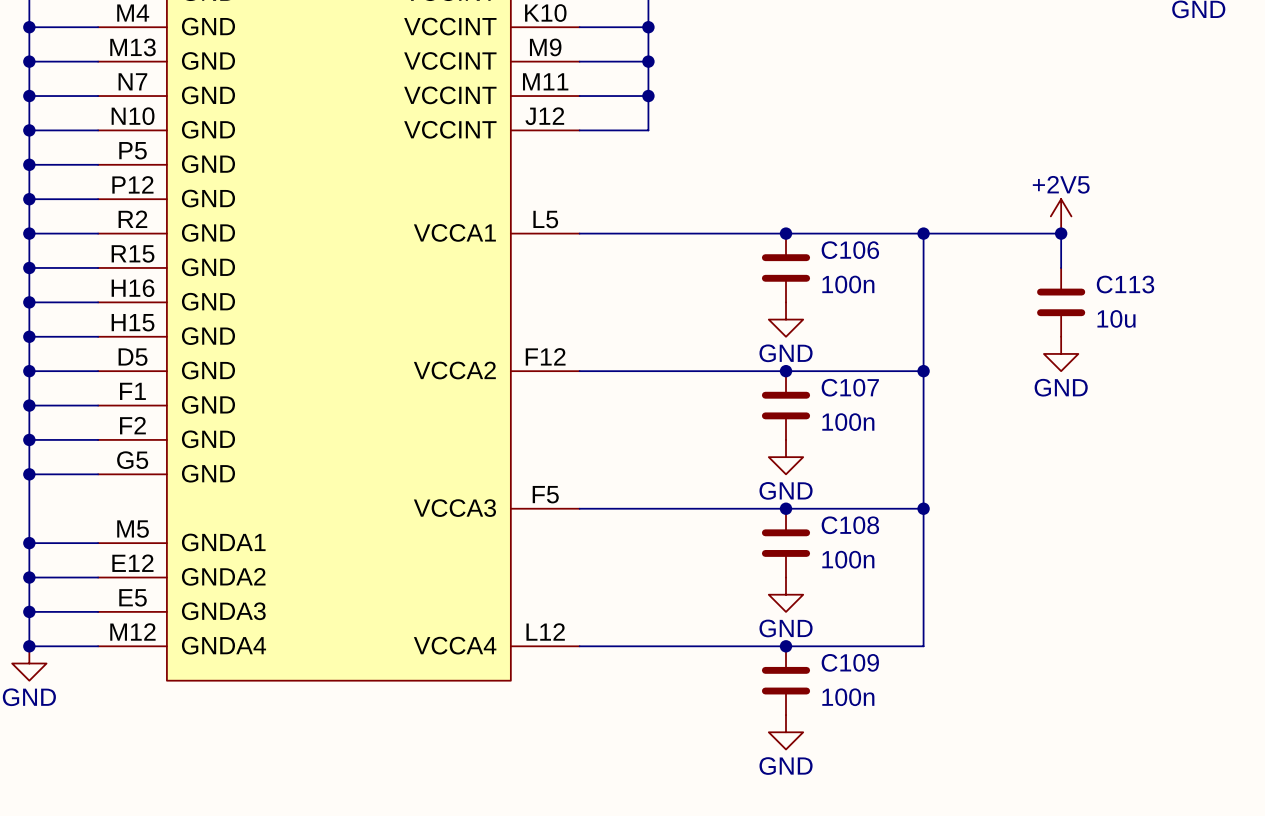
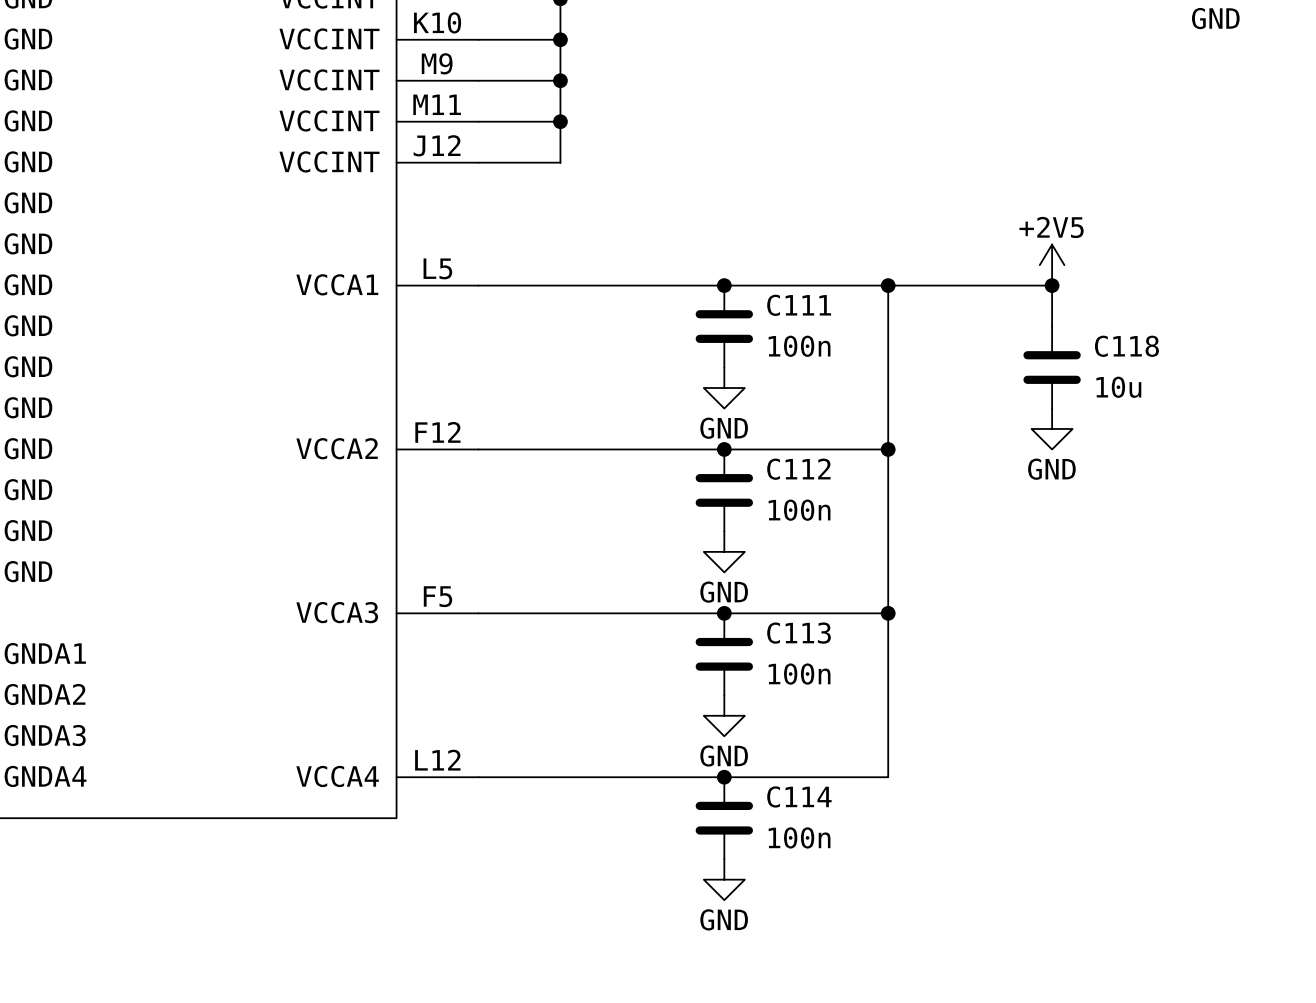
C106 name: C106 (850, 250) -> C111 (799, 305)
C113 name: C113 (1125, 284) -> C118 (1126, 346)
C107 name: C107 (850, 387) -> C112 (798, 469)
C108 name: C108 (850, 525) -> C113 (799, 633)
C109 name: C109 (850, 662) -> C114 (799, 796)

